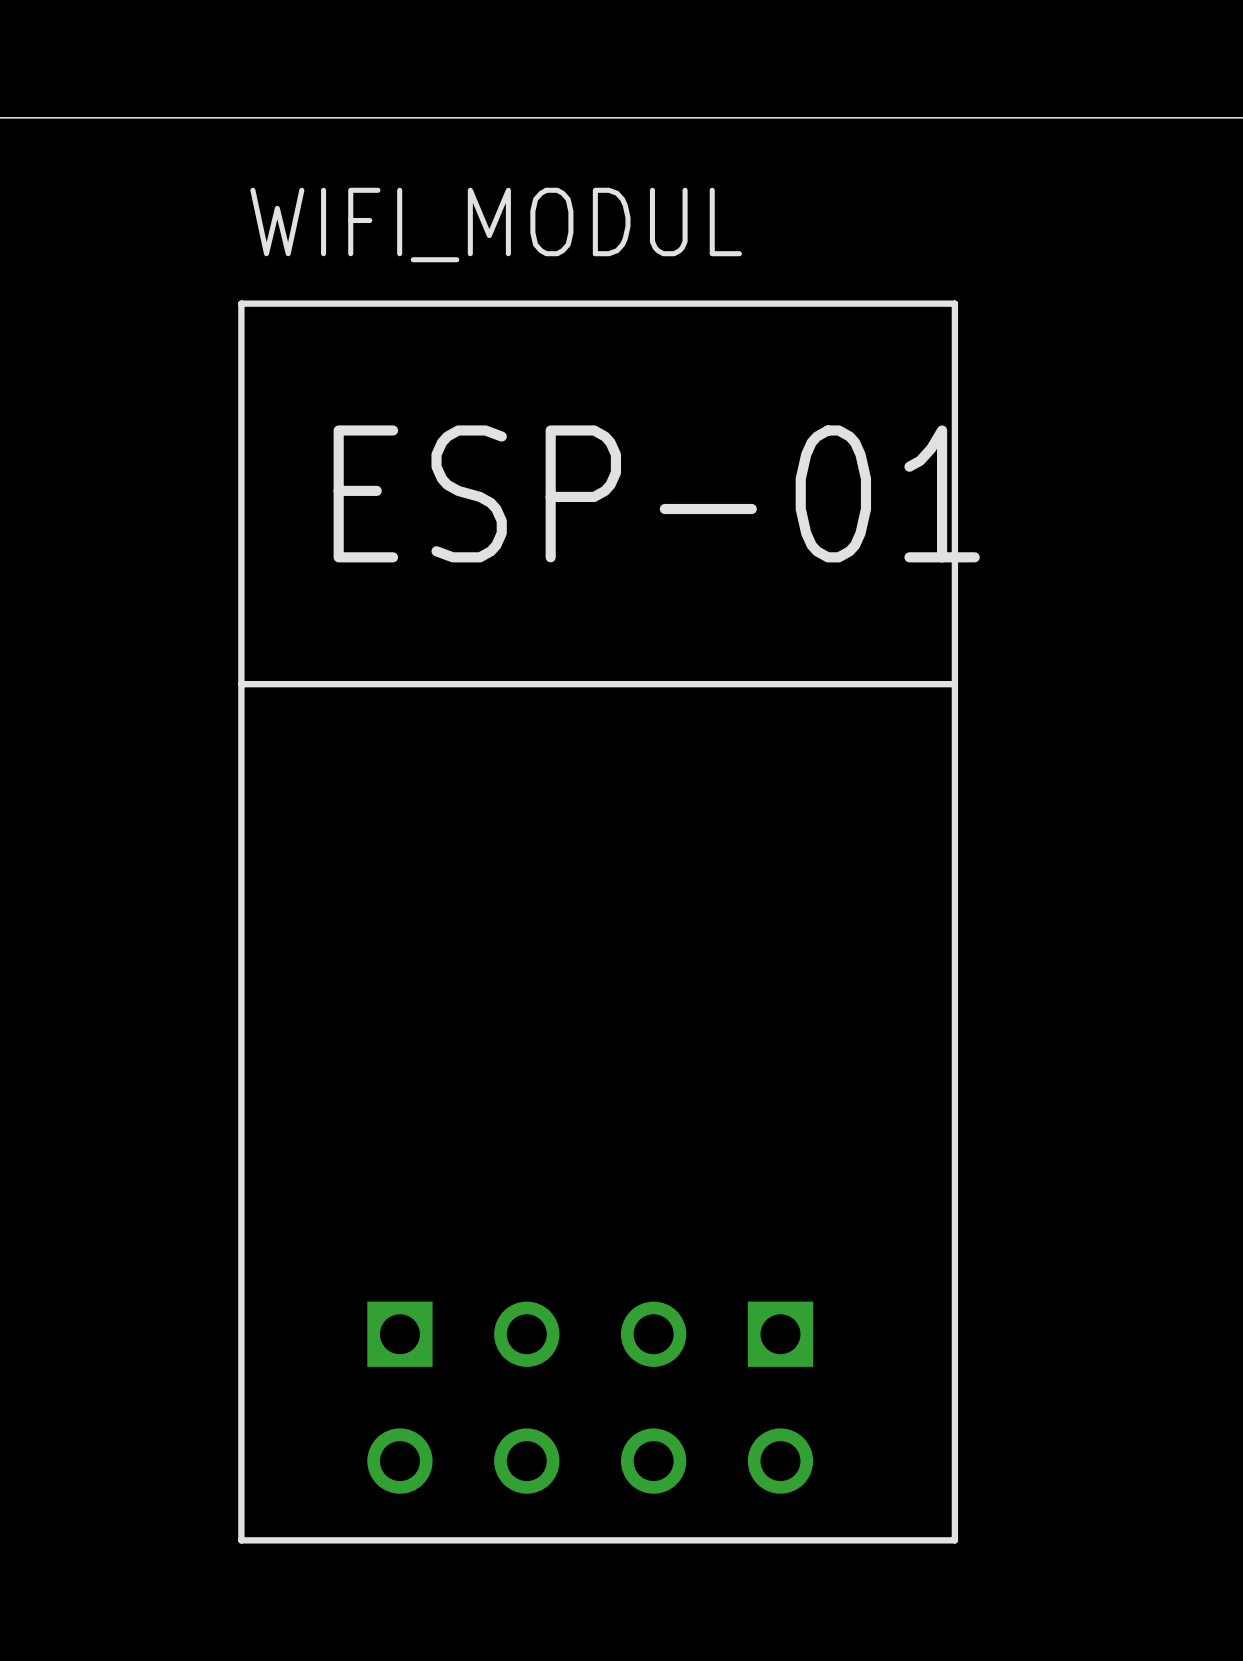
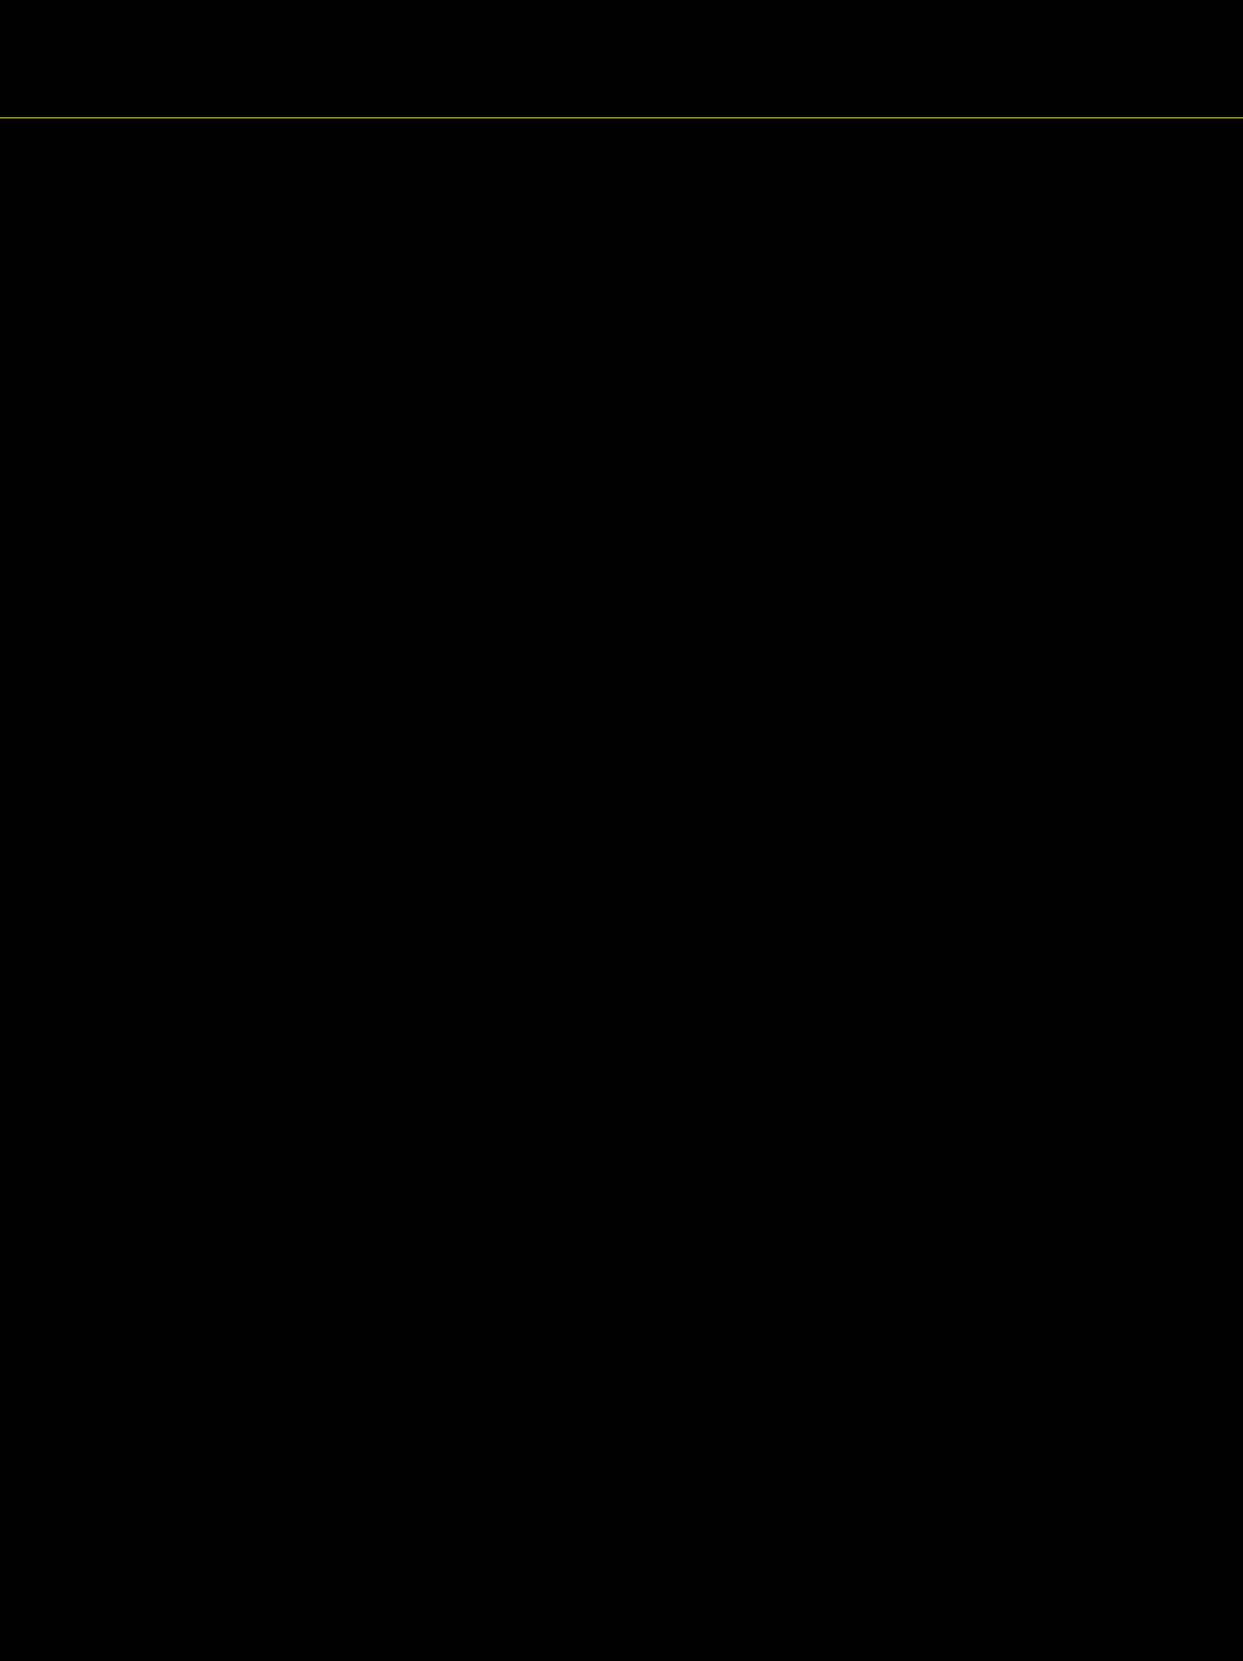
WIFI_MODUL: (598, 922) -> none

